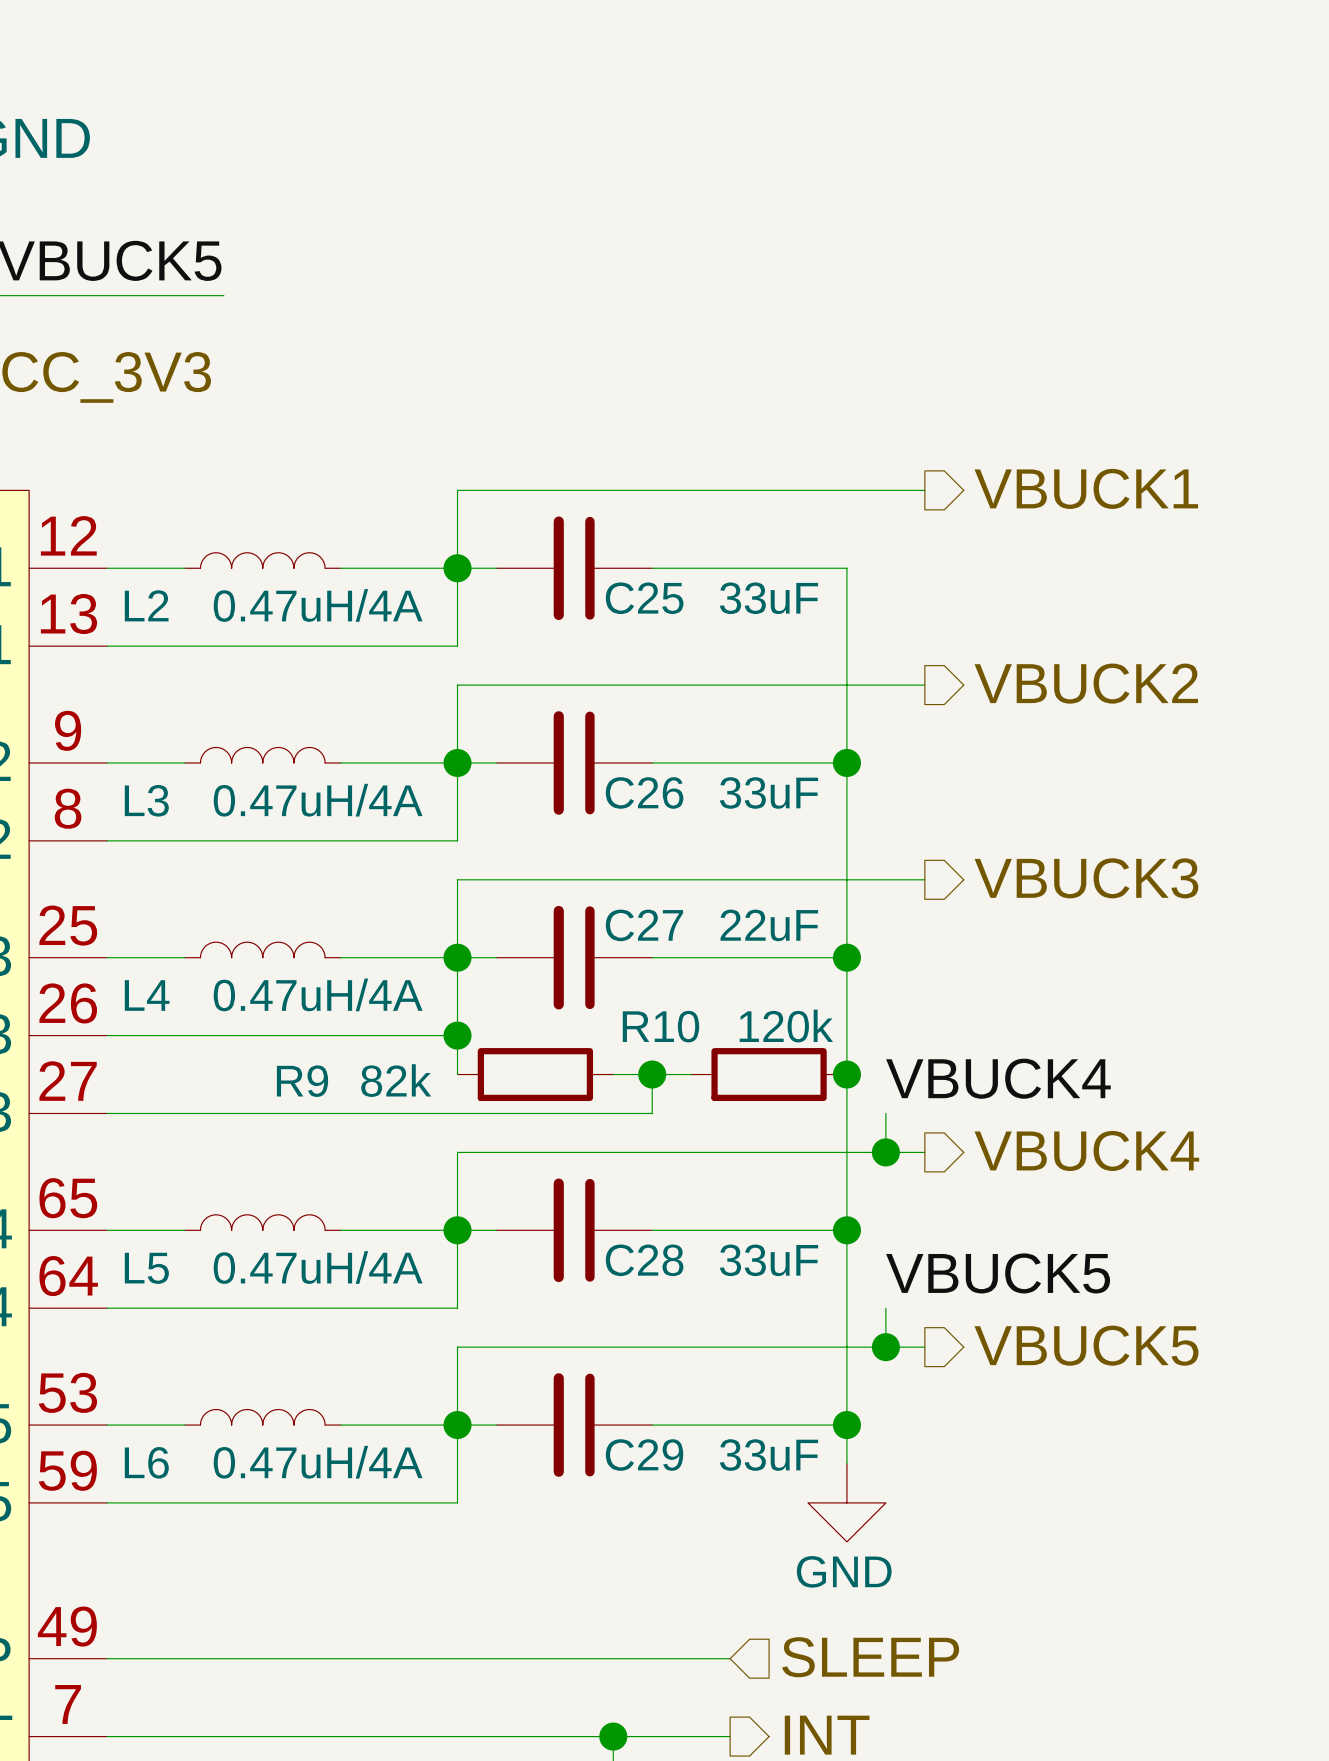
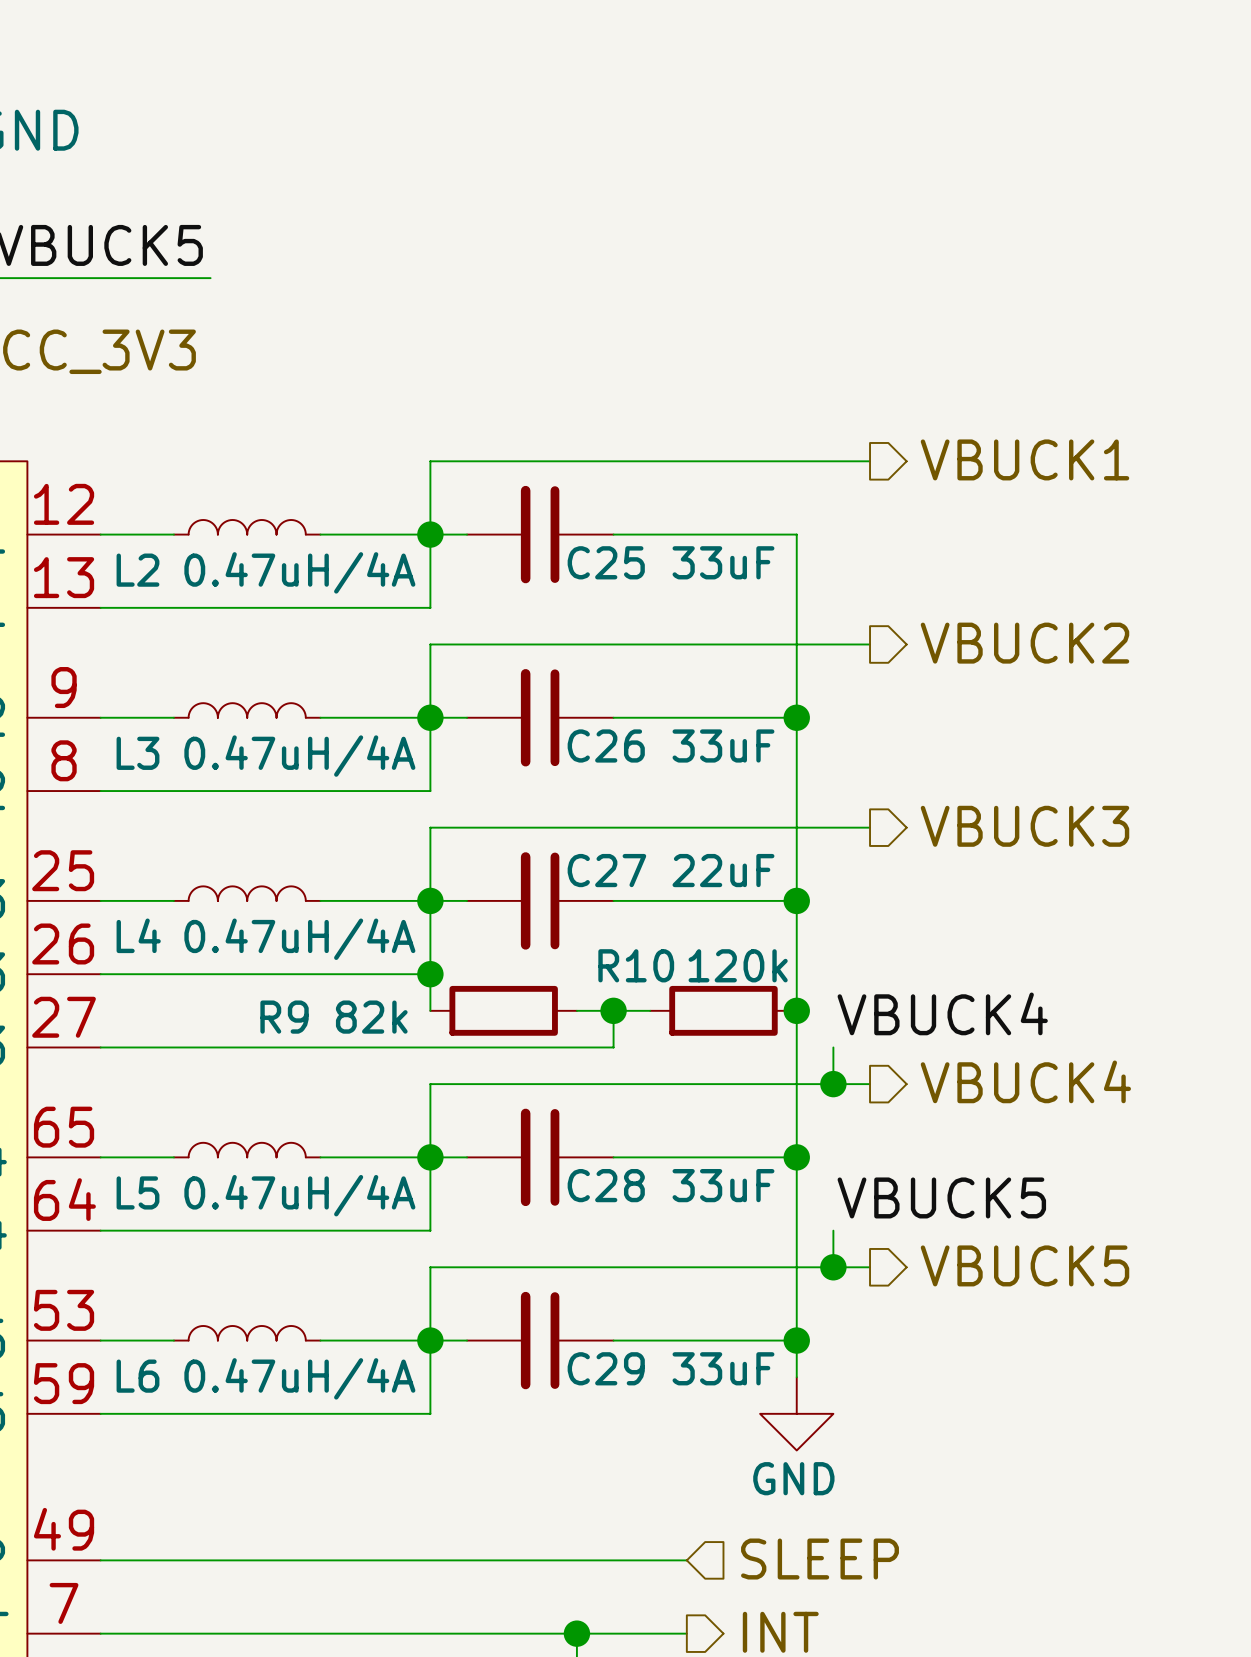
R10 name position: R10 (660, 1026) -> R10 (636, 965)

